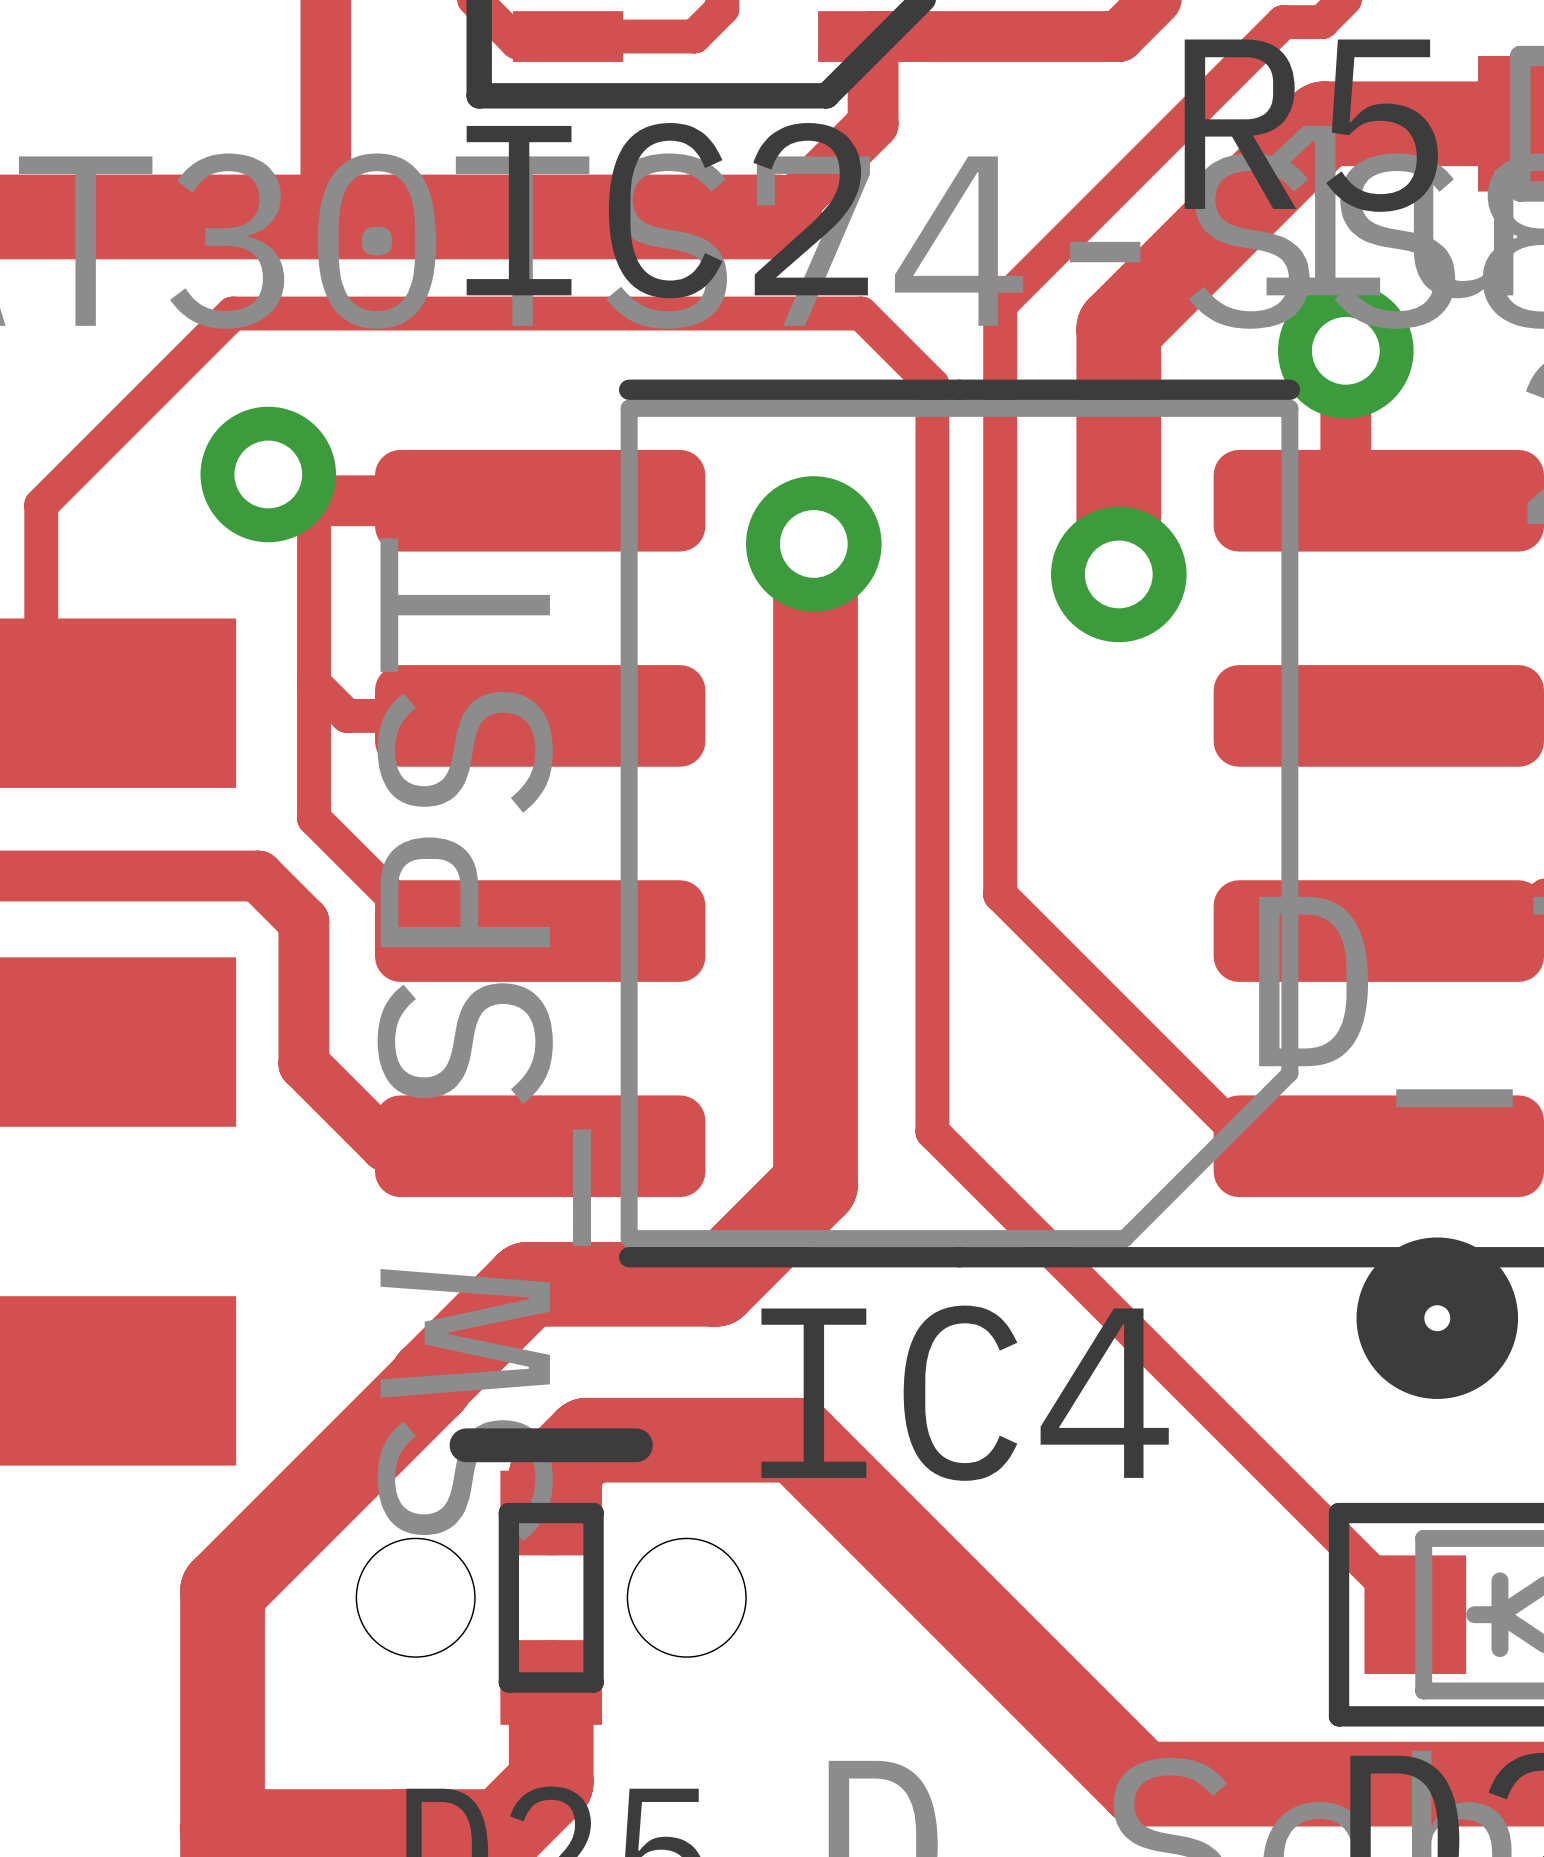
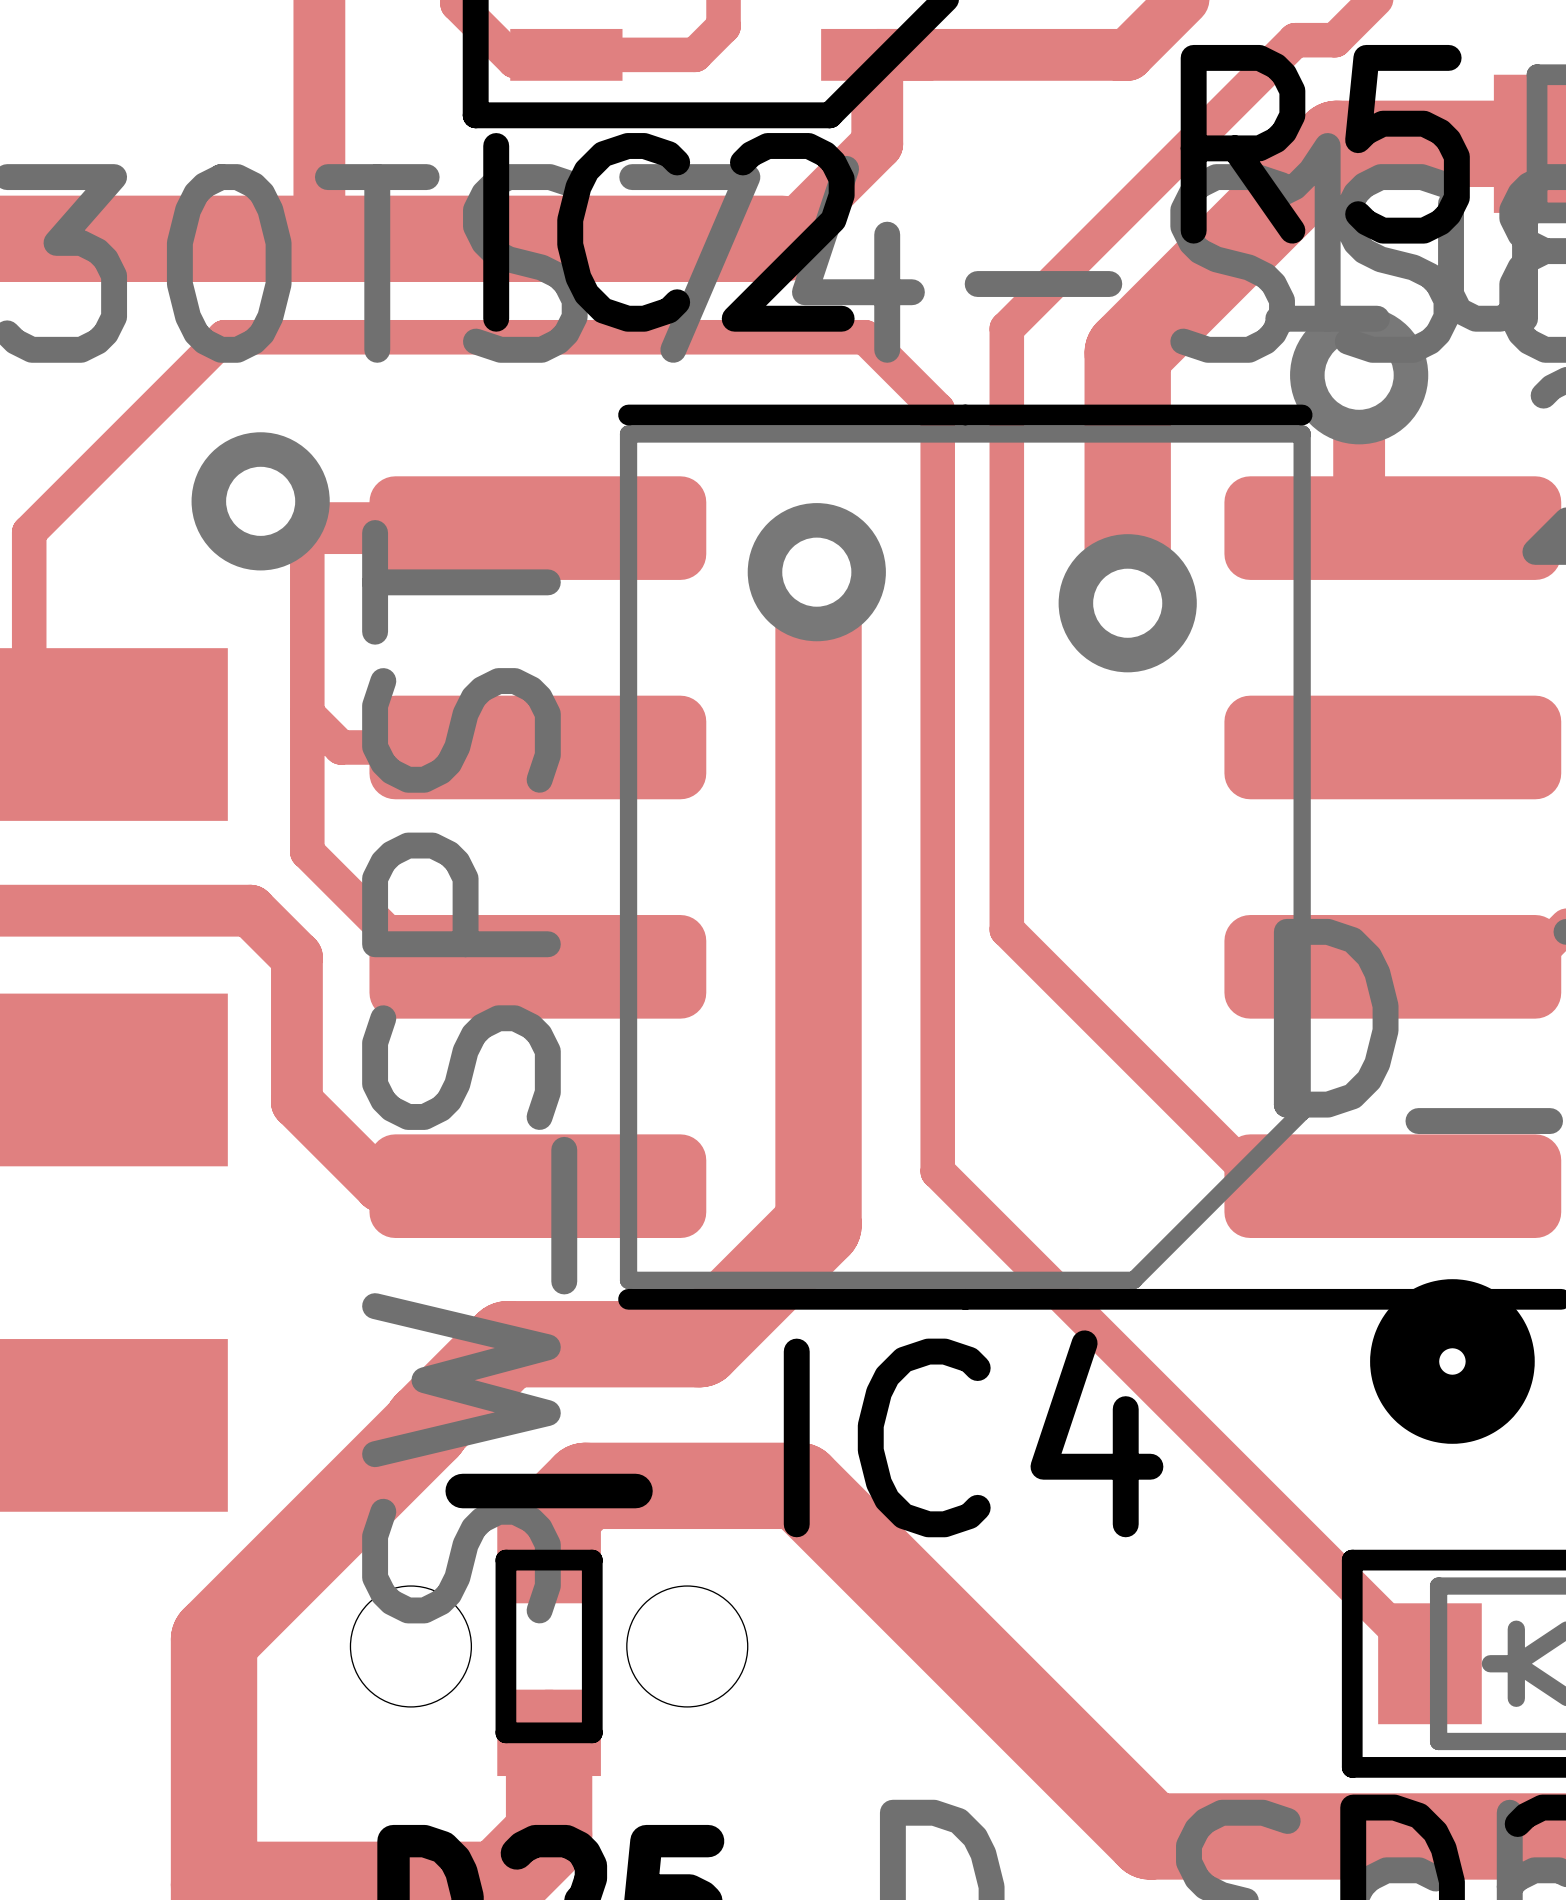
track: (715, 1284) (527, 1284) (510, 1301) -> (716, 1326) (699, 1344) (507, 1344)

